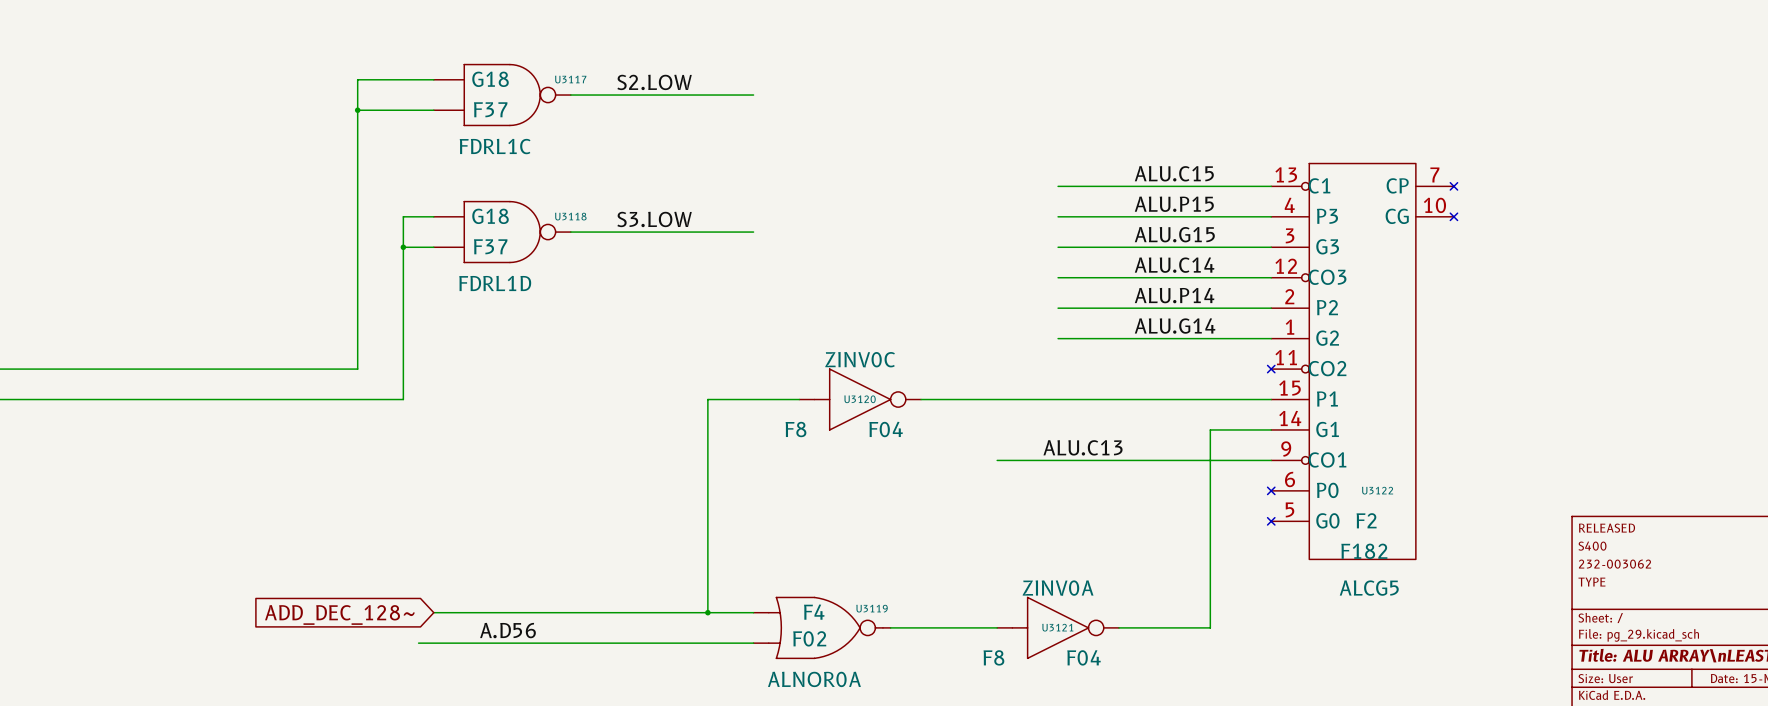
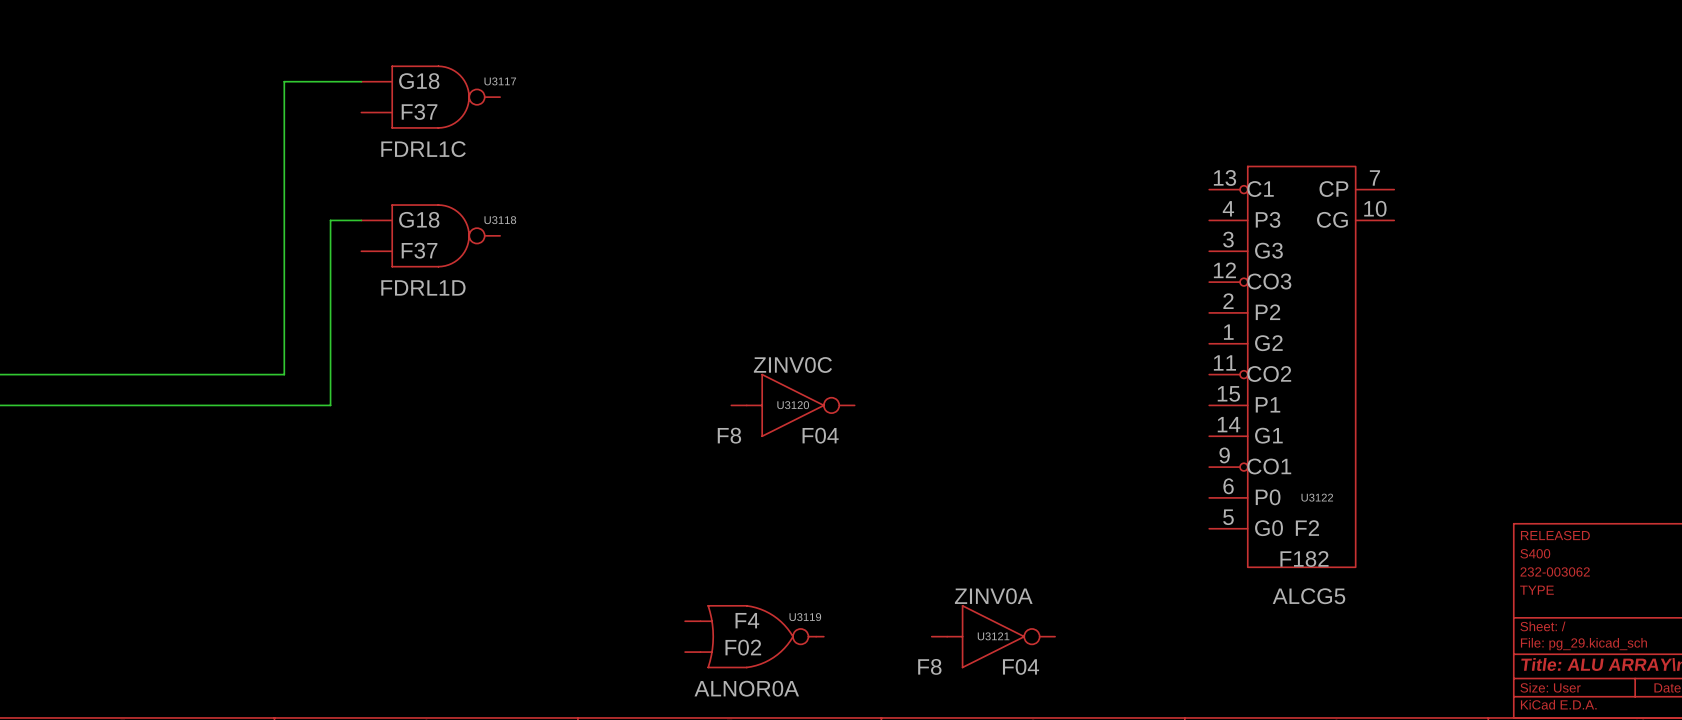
label: S2.LOW (654, 82) -> none
wire: (570, 95) (753, 95) -> none
wire: (357, 110) (433, 110) -> none
junction: (357, 110) -> none
label: ALU.C15 (1174, 173) -> none
wire: (1058, 186) (1271, 186) -> none
no-connect mark: (1453, 186) -> none
label: ALU.P15 (1174, 204) -> none
wire: (1058, 216) (1271, 216) -> none
no-connect mark: (1453, 216) -> none
label: S3.LOW (654, 219) -> none
wire: (570, 232) (753, 232) -> none
label: ALU.G15 (1174, 234) -> none
wire: (403, 247) (433, 247) -> none
junction: (403, 247) -> none
wire: (1058, 247) (1271, 247) -> none
label: ALU.C14 (1174, 265) -> none
wire: (1058, 277) (1271, 277) -> none
label: ALU.P14 (1174, 295) -> none
wire: (1058, 308) (1271, 308) -> none
label: ALU.G14 (1175, 326) -> none
wire: (1058, 338) (1271, 338) -> none
no-connect mark: (1271, 369) -> none
wire: (799, 399) (707, 399) (707, 612) -> none
wire: (921, 399) (1271, 399) -> none
wire: (1271, 429) (1210, 429) (1210, 627) (1118, 627) -> none
label: ALU.C13 (1083, 447) -> none
wire: (997, 460) (1271, 460) -> none
no-connect mark: (1271, 490) -> none
no-connect mark: (1271, 521) -> none
wire: (433, 612) (753, 612) -> none
junction: (707, 612) -> none
global label: ADD_DEC_128~ (339, 614) -> none
wire: (890, 627) (997, 627) -> none
label: A.D56 (507, 630) -> none
wire: (418, 643) (753, 643) -> none

